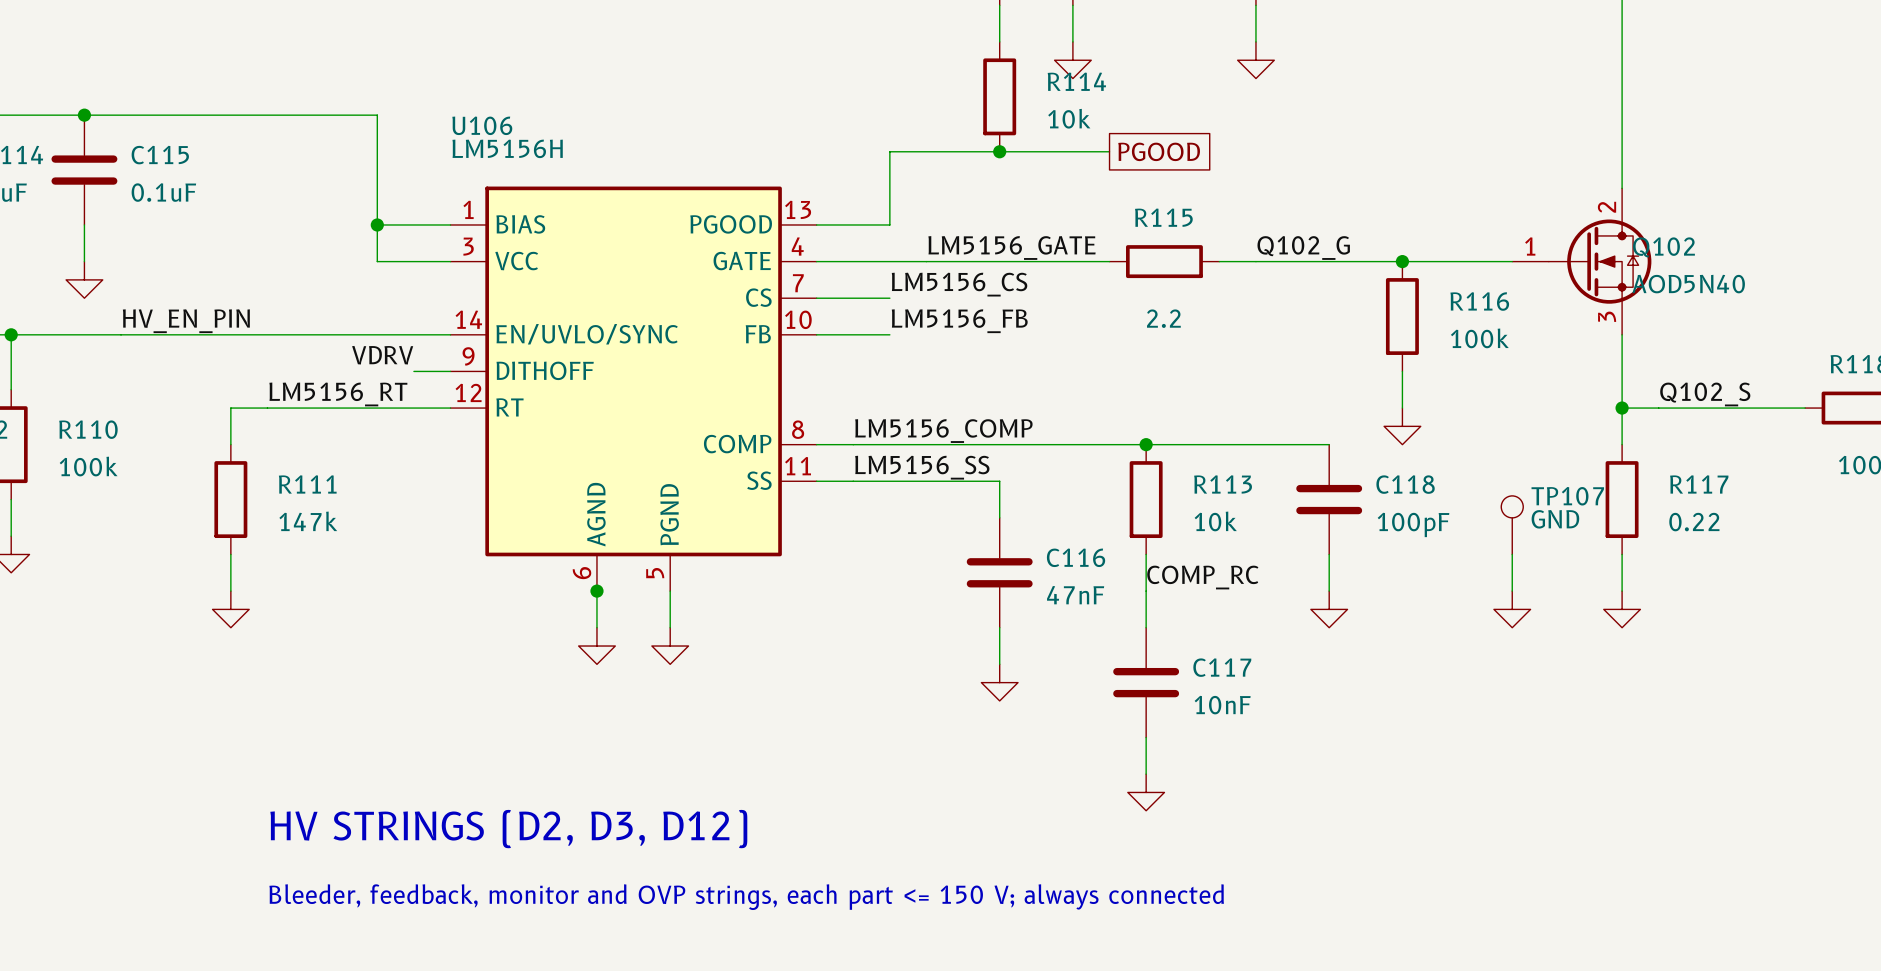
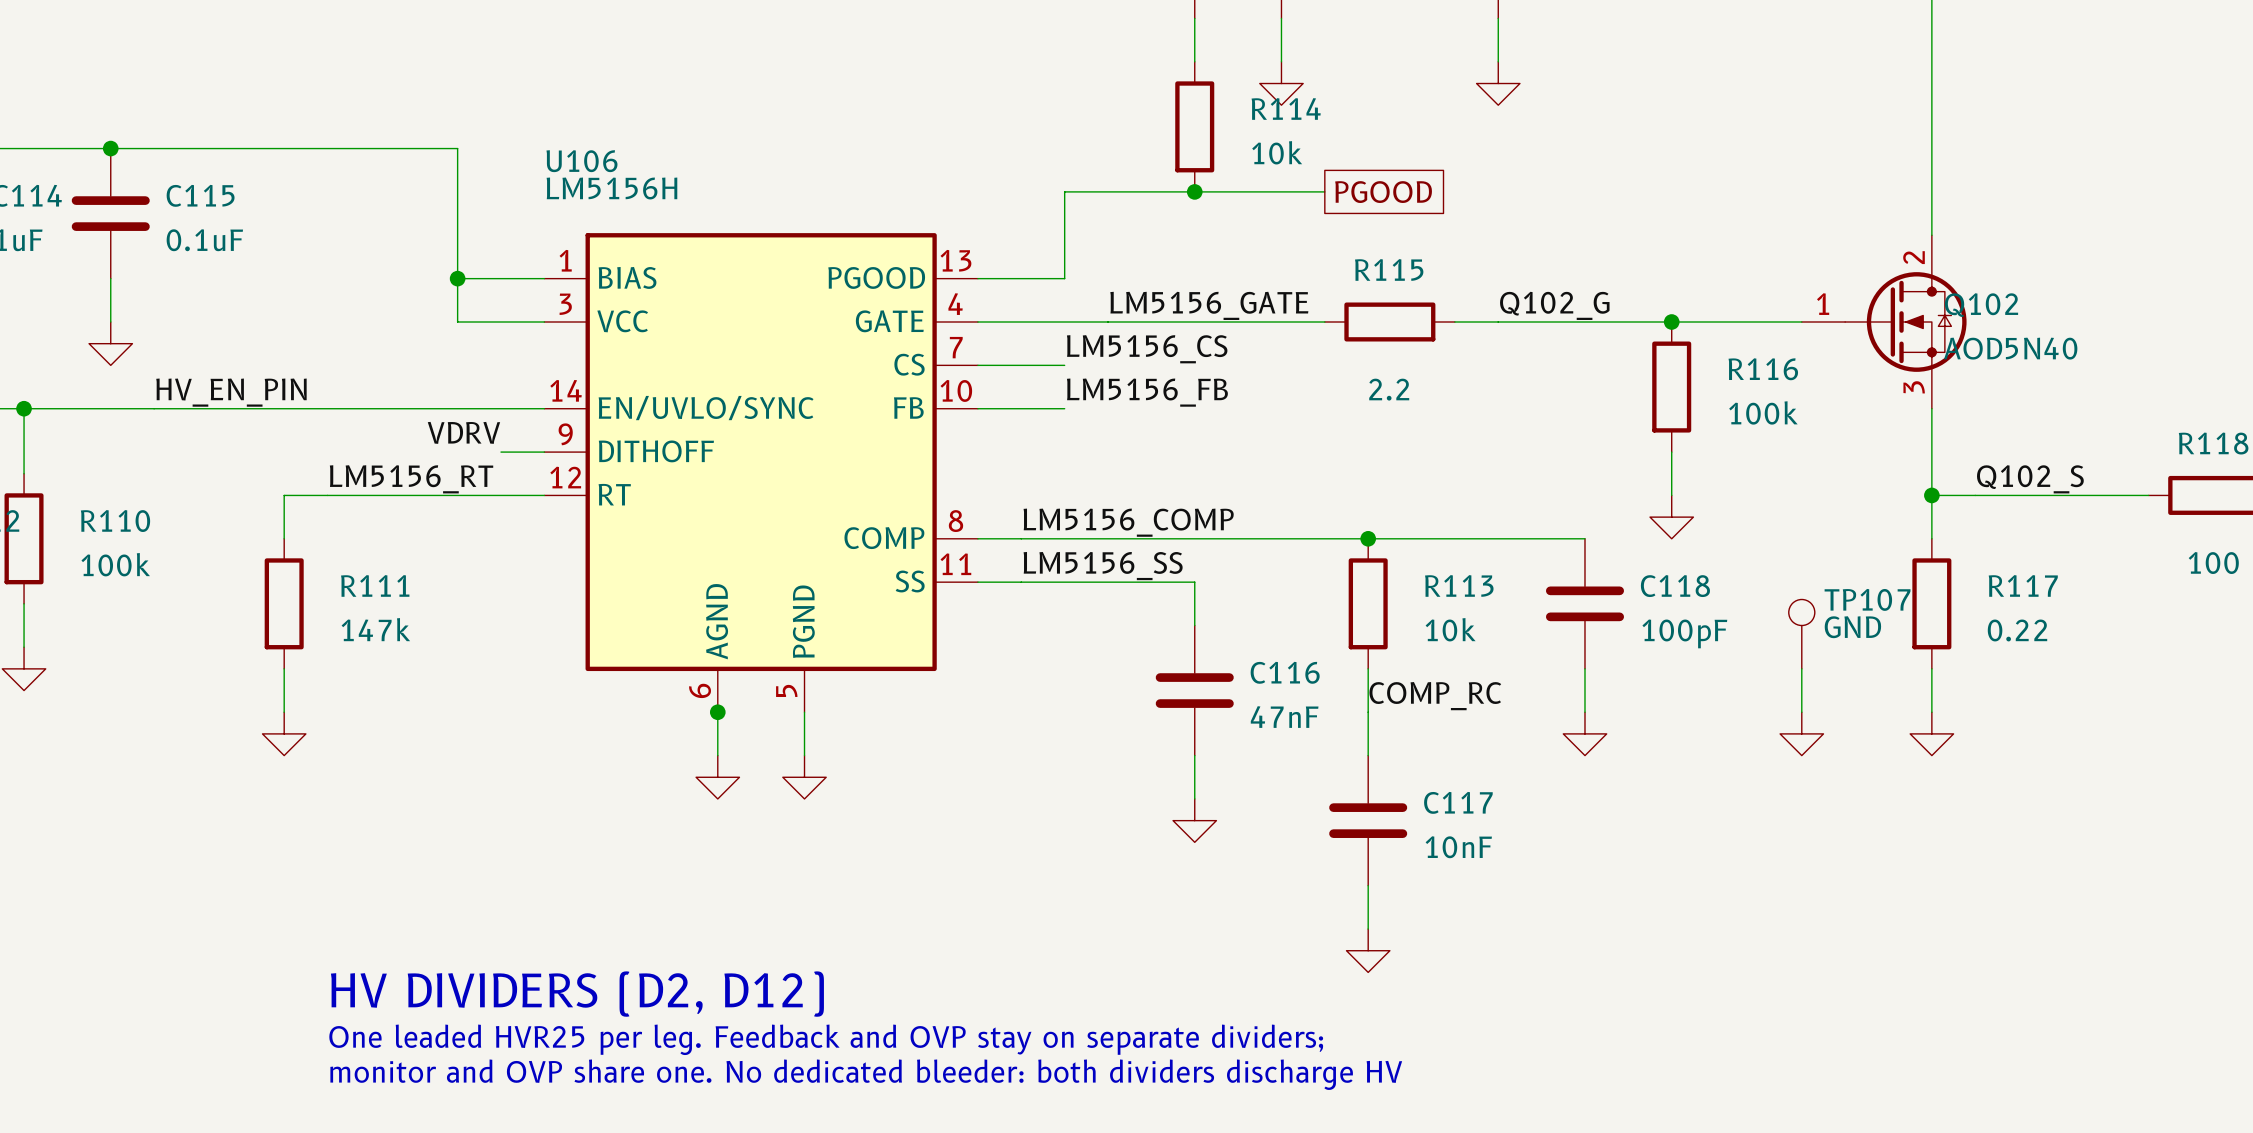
text: HV STRINGS (D2, D3, D12) (508, 829) -> HV DIVIDERS (D2, D12) (577, 994)
text: none -> One leaded HVR25 per leg. Feedback and OVP stay on separate dividers; (826, 1039)
text: Bleeder, feedback, monitor and OVP strings, each part <= 150 V; always connected (746, 897) -> monitor and OVP share one. No dedicated bleeder: both dividers discharge HV (866, 1074)

